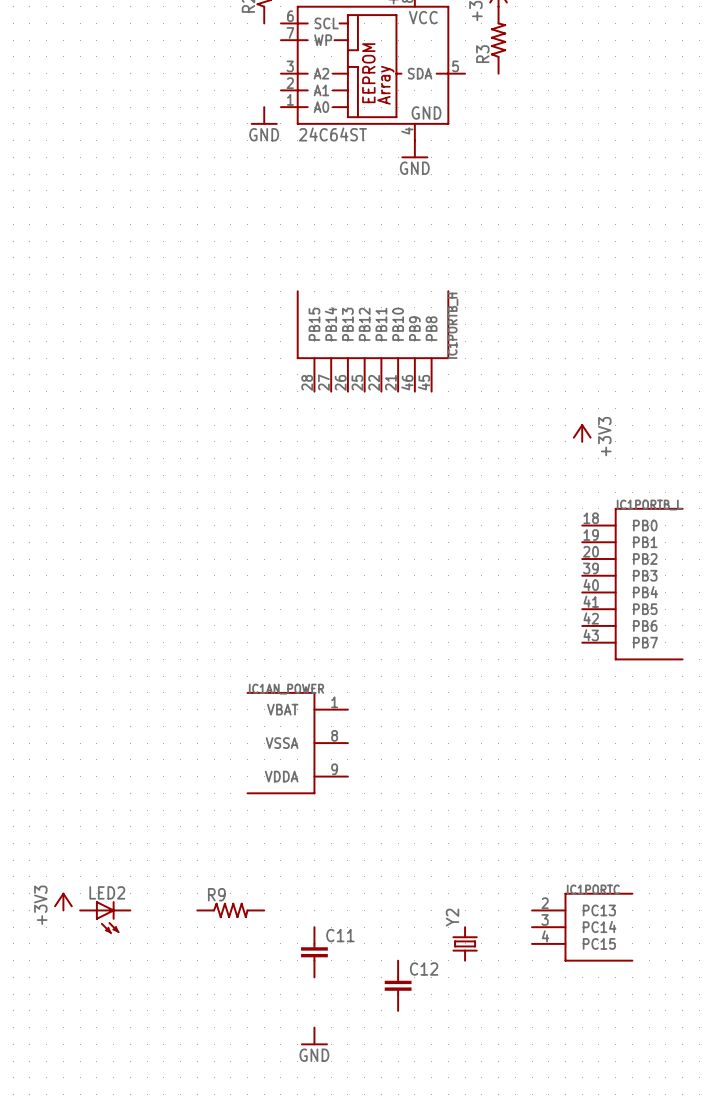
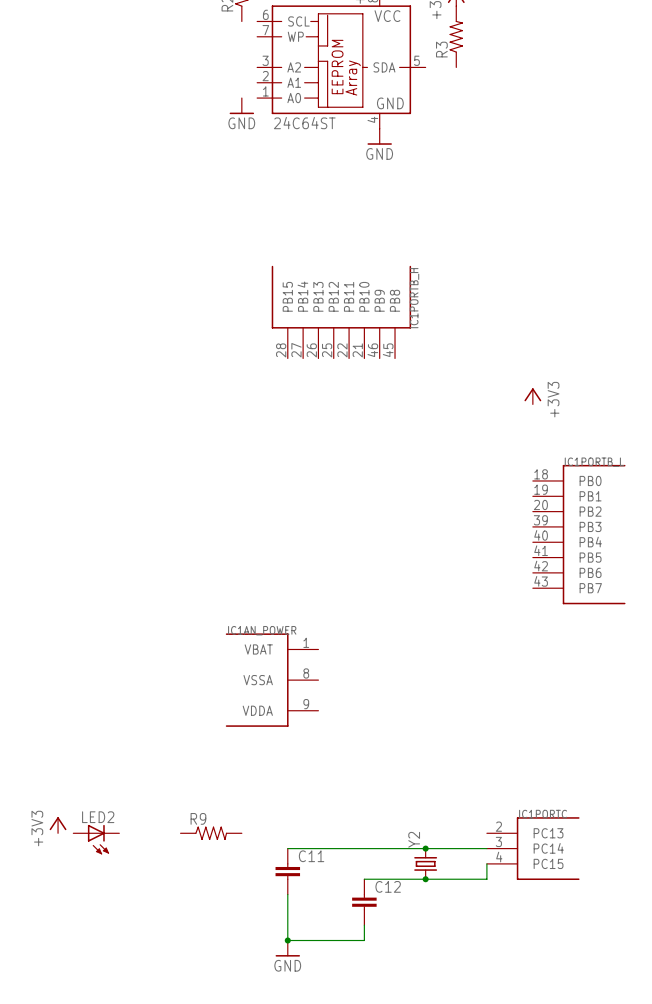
wire: none -> (287, 848) (486, 848)
junction: none -> (425, 848)
wire: none -> (486, 863) (486, 879) (364, 879)
junction: none -> (425, 879)
wire: none -> (287, 894) (287, 940) (364, 940) (364, 925)
junction: none -> (287, 940)

